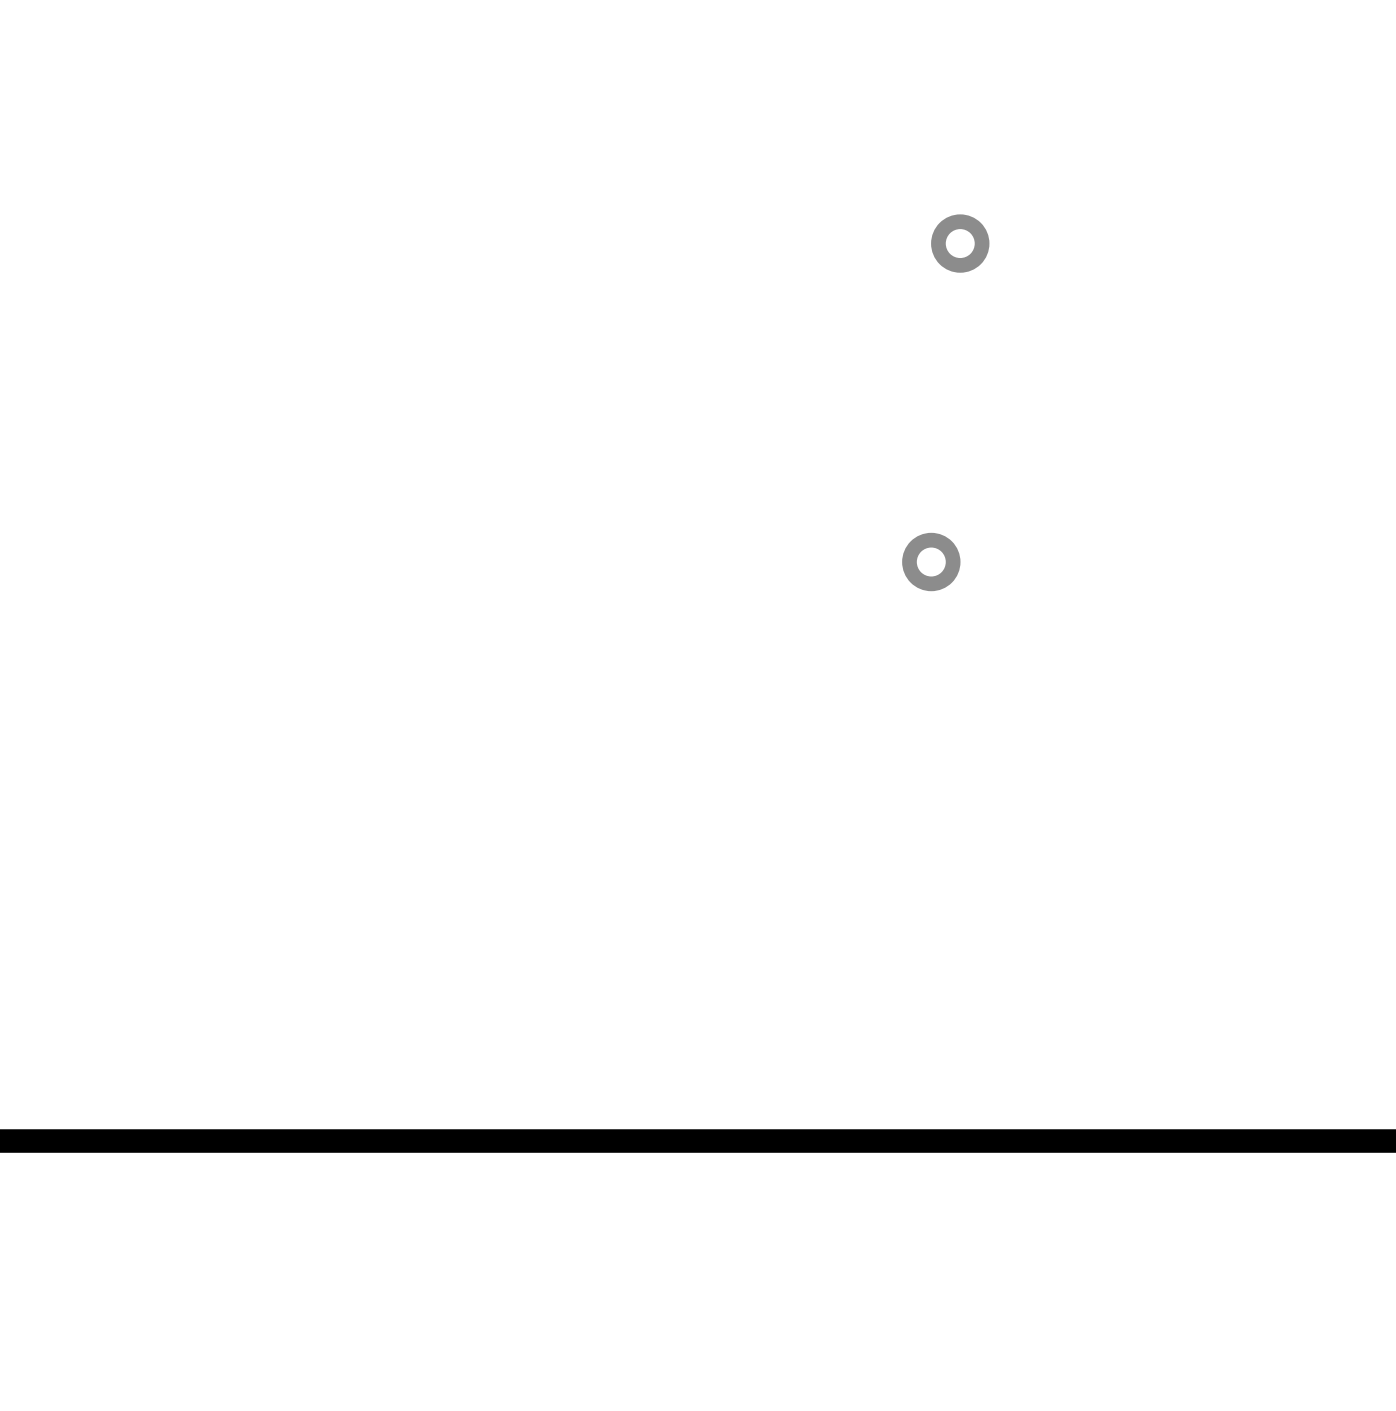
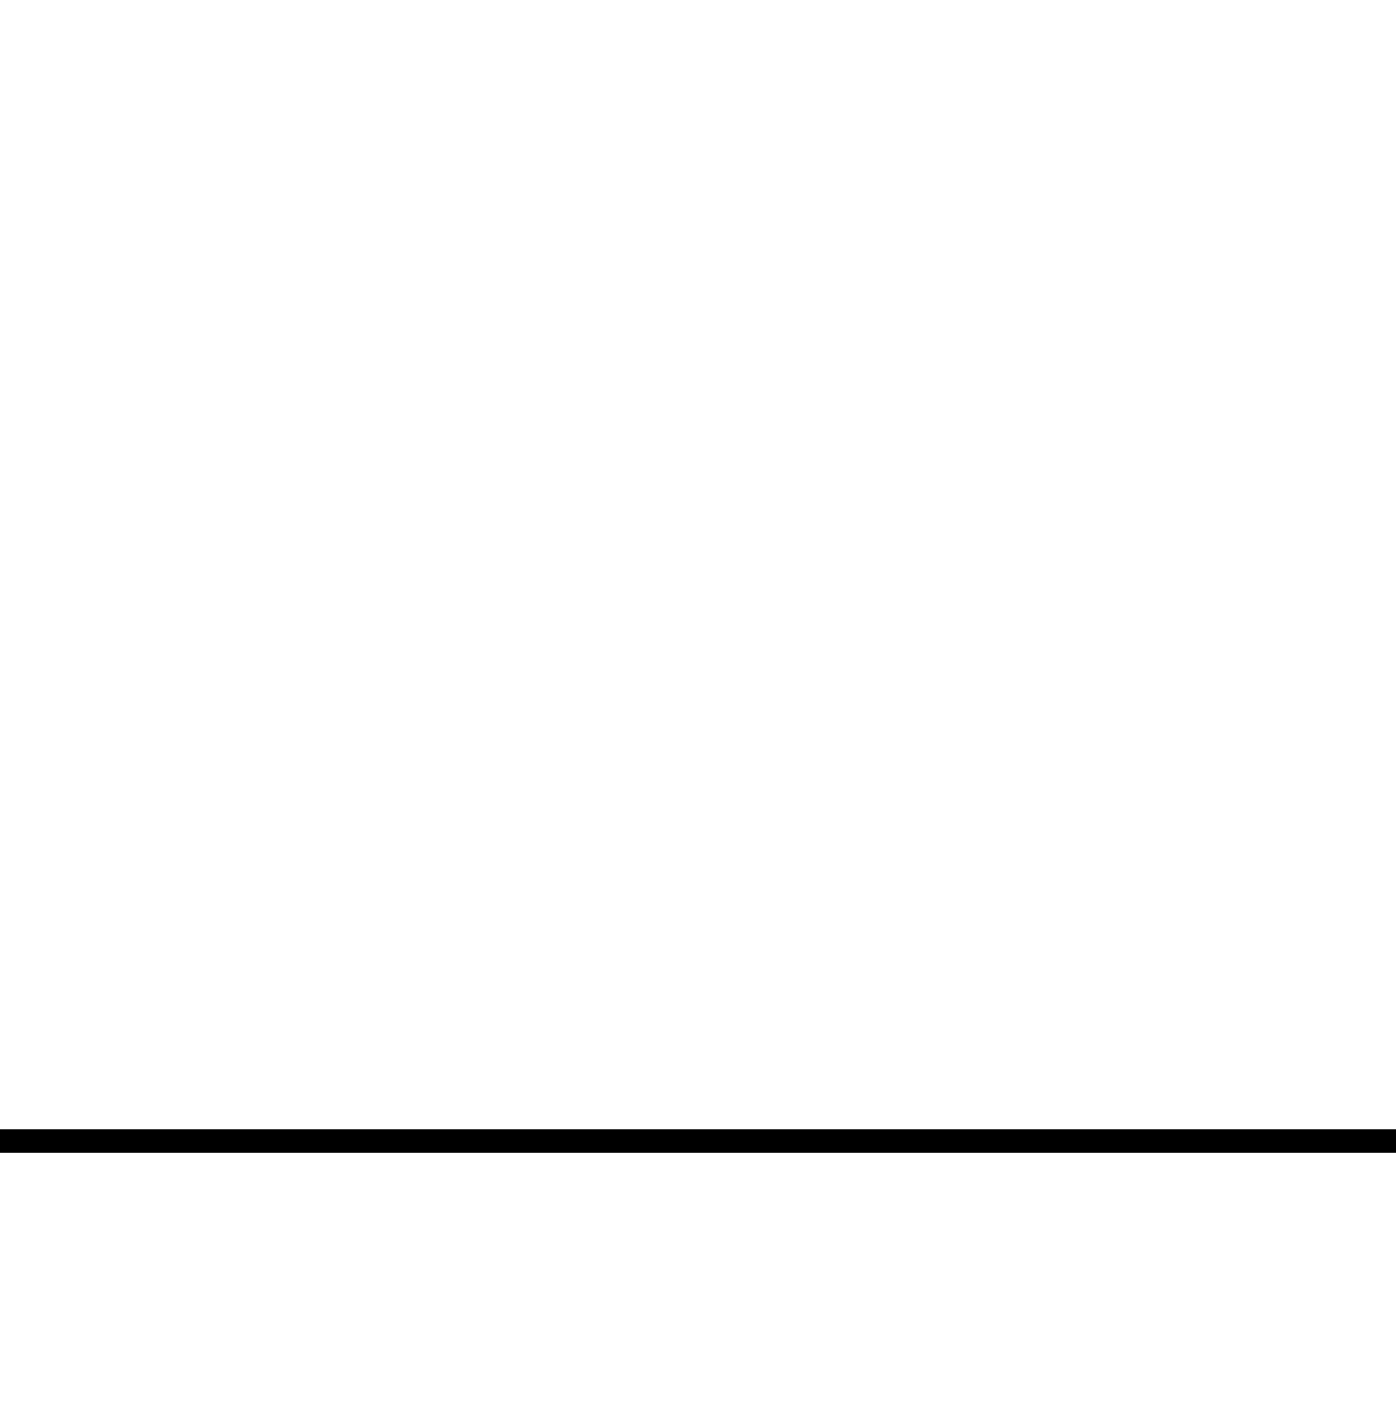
part: (960, 243) -> none
part: (931, 562) -> none

